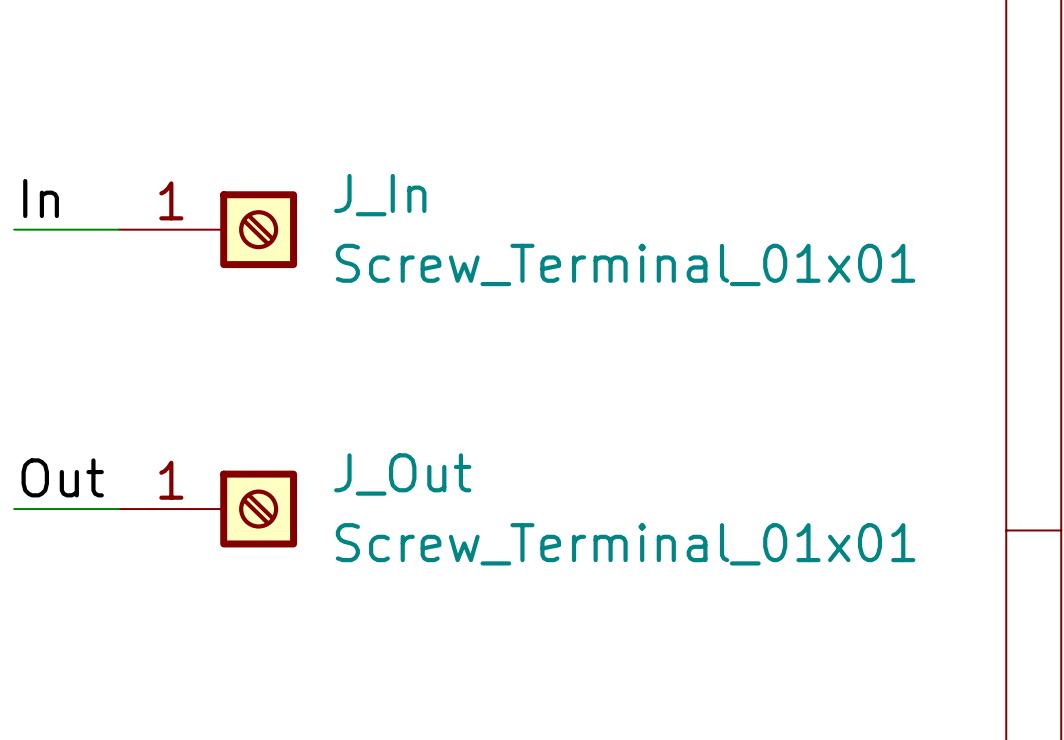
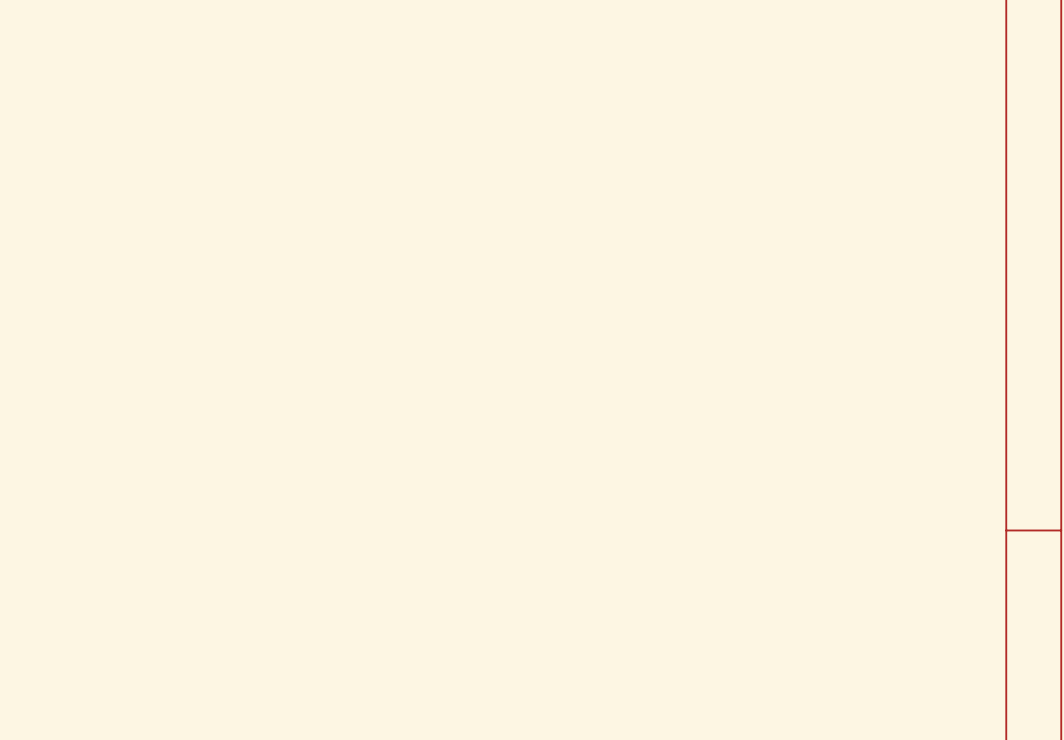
label: In (41, 198) -> none
wire: (14, 229) (118, 229) -> none
J_In: Screw_Terminal_01x01 (208, 229) -> none
label: Out (62, 477) -> none
wire: (14, 509) (118, 509) -> none
J_Out: Screw_Terminal_01x01 (208, 509) -> none

